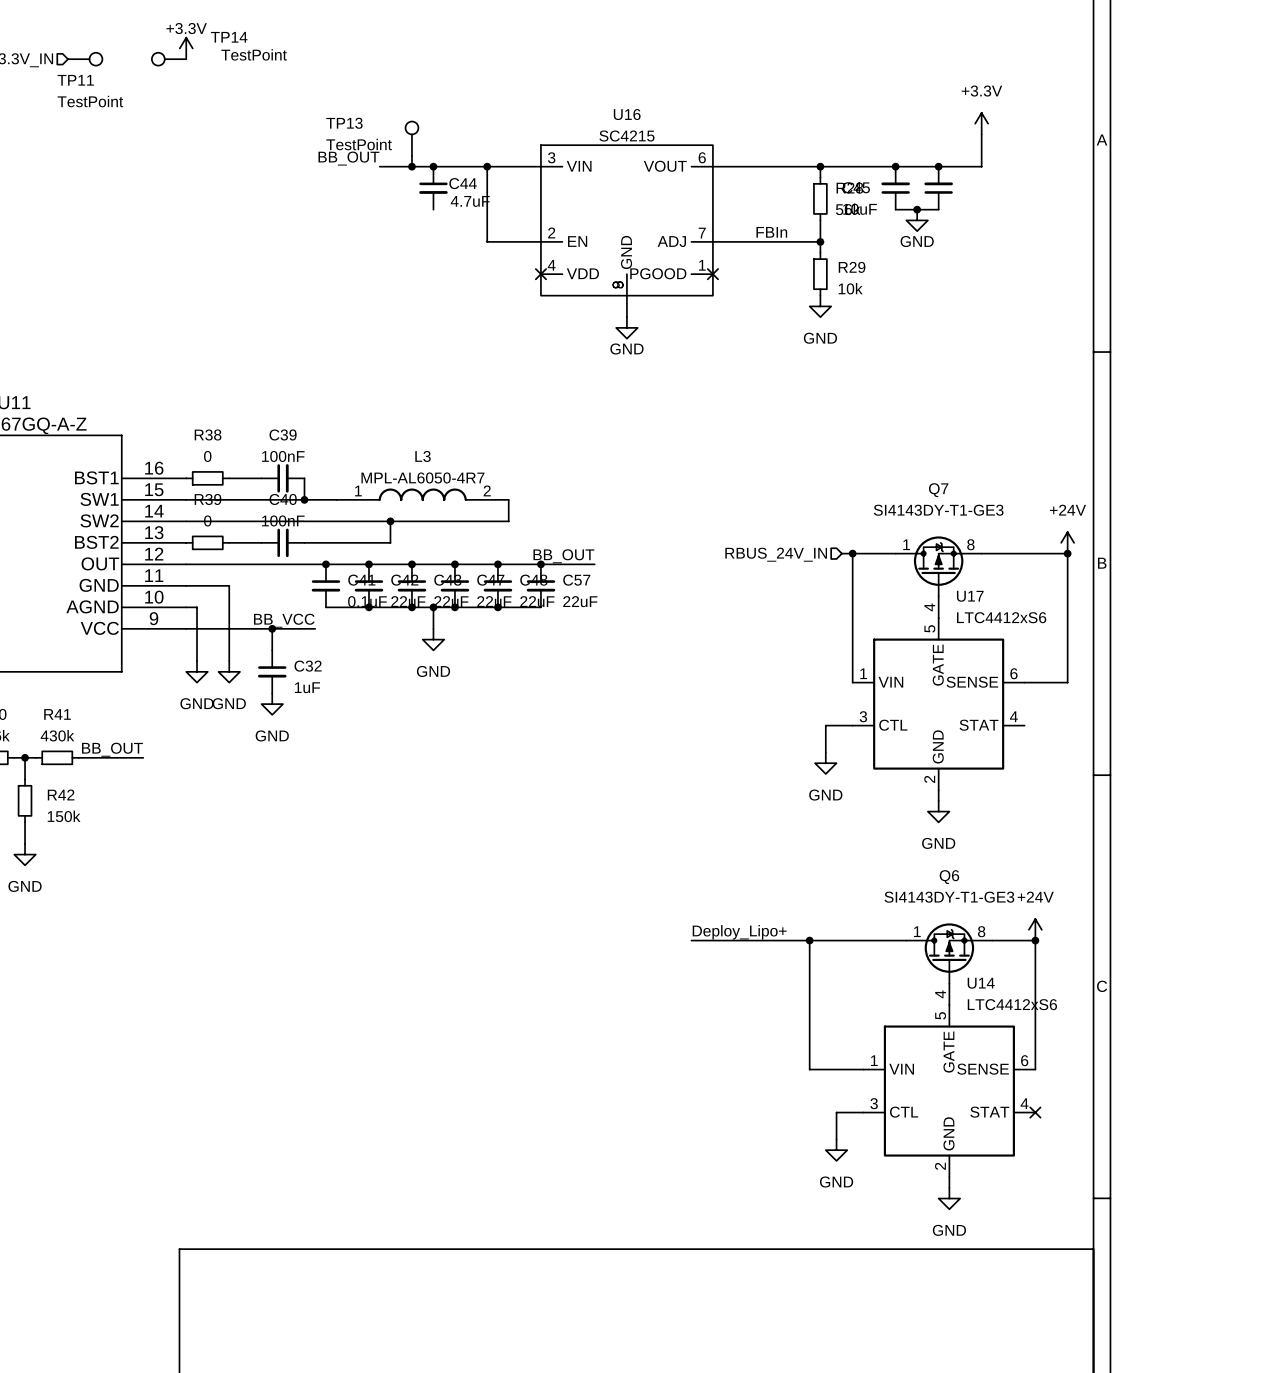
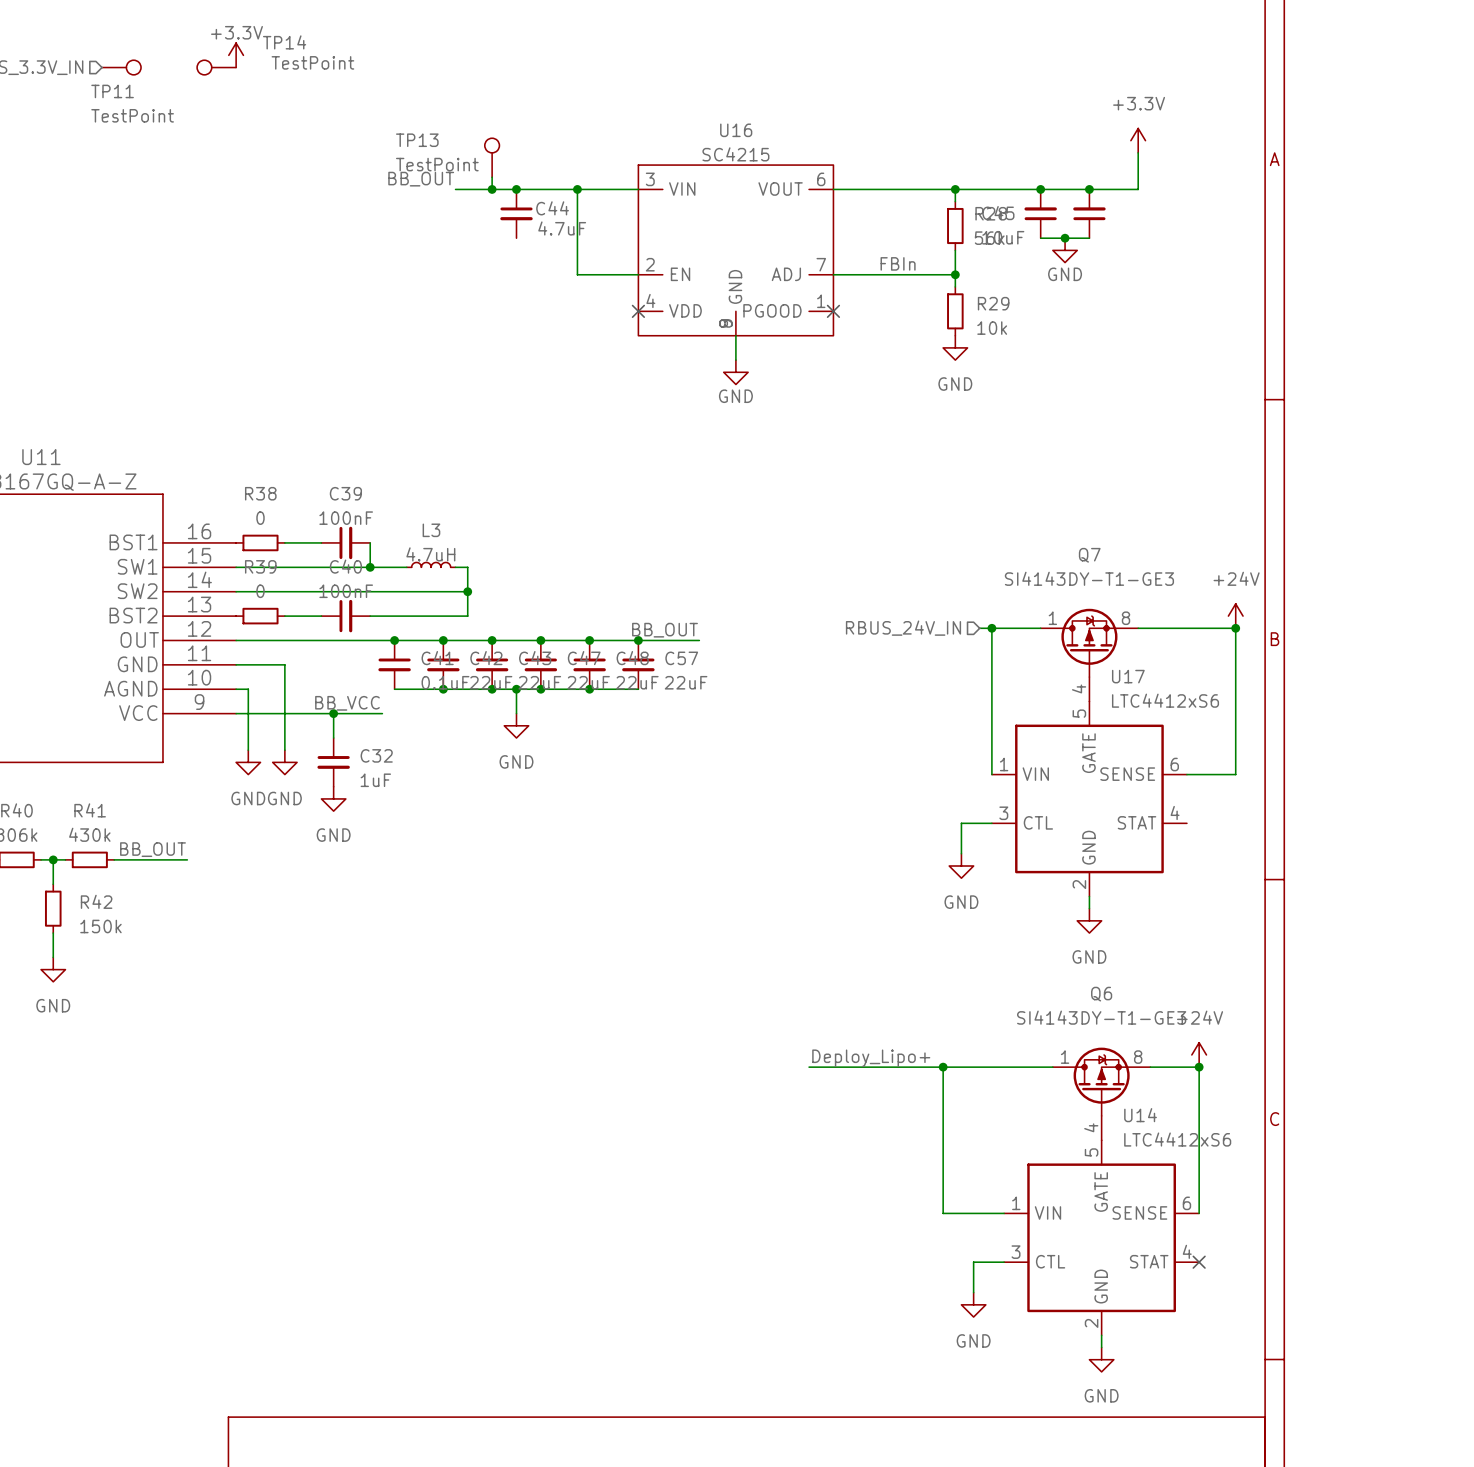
L3 value: MPL-AL6050-4R7 (422, 477) -> 4.7uH (430, 554)
L3 symbol: [336, 488, 509, 501] -> [406, 562, 456, 568]
wire: (508, 499) (508, 521) (390, 521) -> (455, 567) (467, 567) (467, 591)

